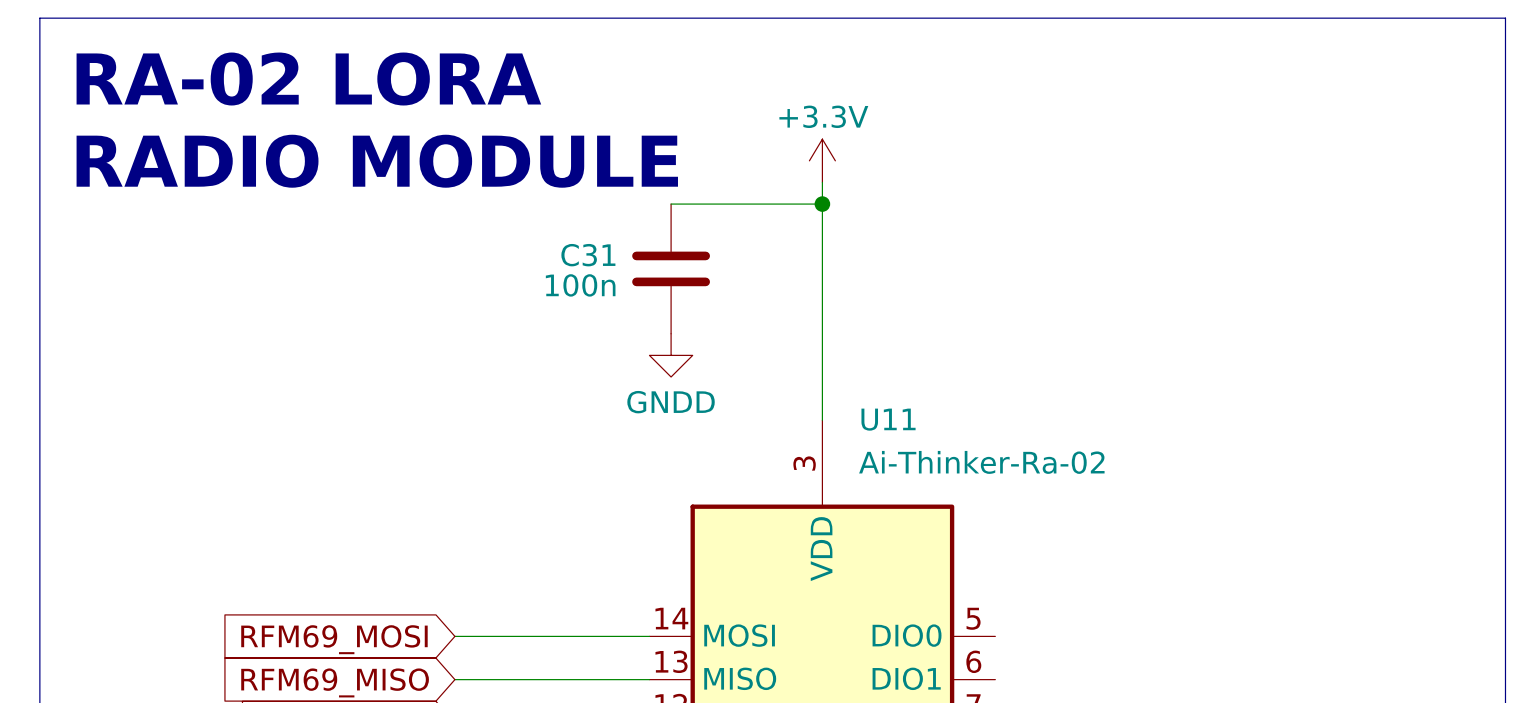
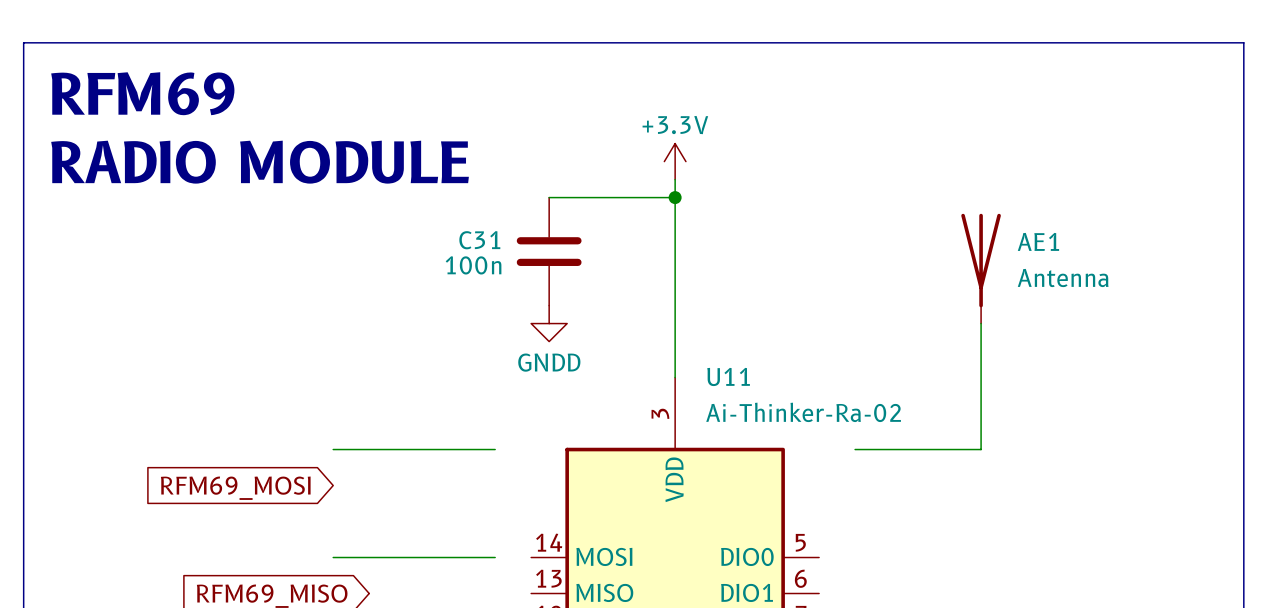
text: RA-02 LORA (308, 79) -> RFM69 (142, 93)
AE1: none -> Antenna (981, 268)
wire: none -> (981, 323) (981, 449) (855, 449)
wire: (606, 636) (649, 636) -> (333, 557) (369, 557)
global label position: RFM69_MOSI (334, 639) -> RFM69_MOSI (235, 488)
wire: (454, 679) (649, 679) -> (333, 449) (495, 449)

